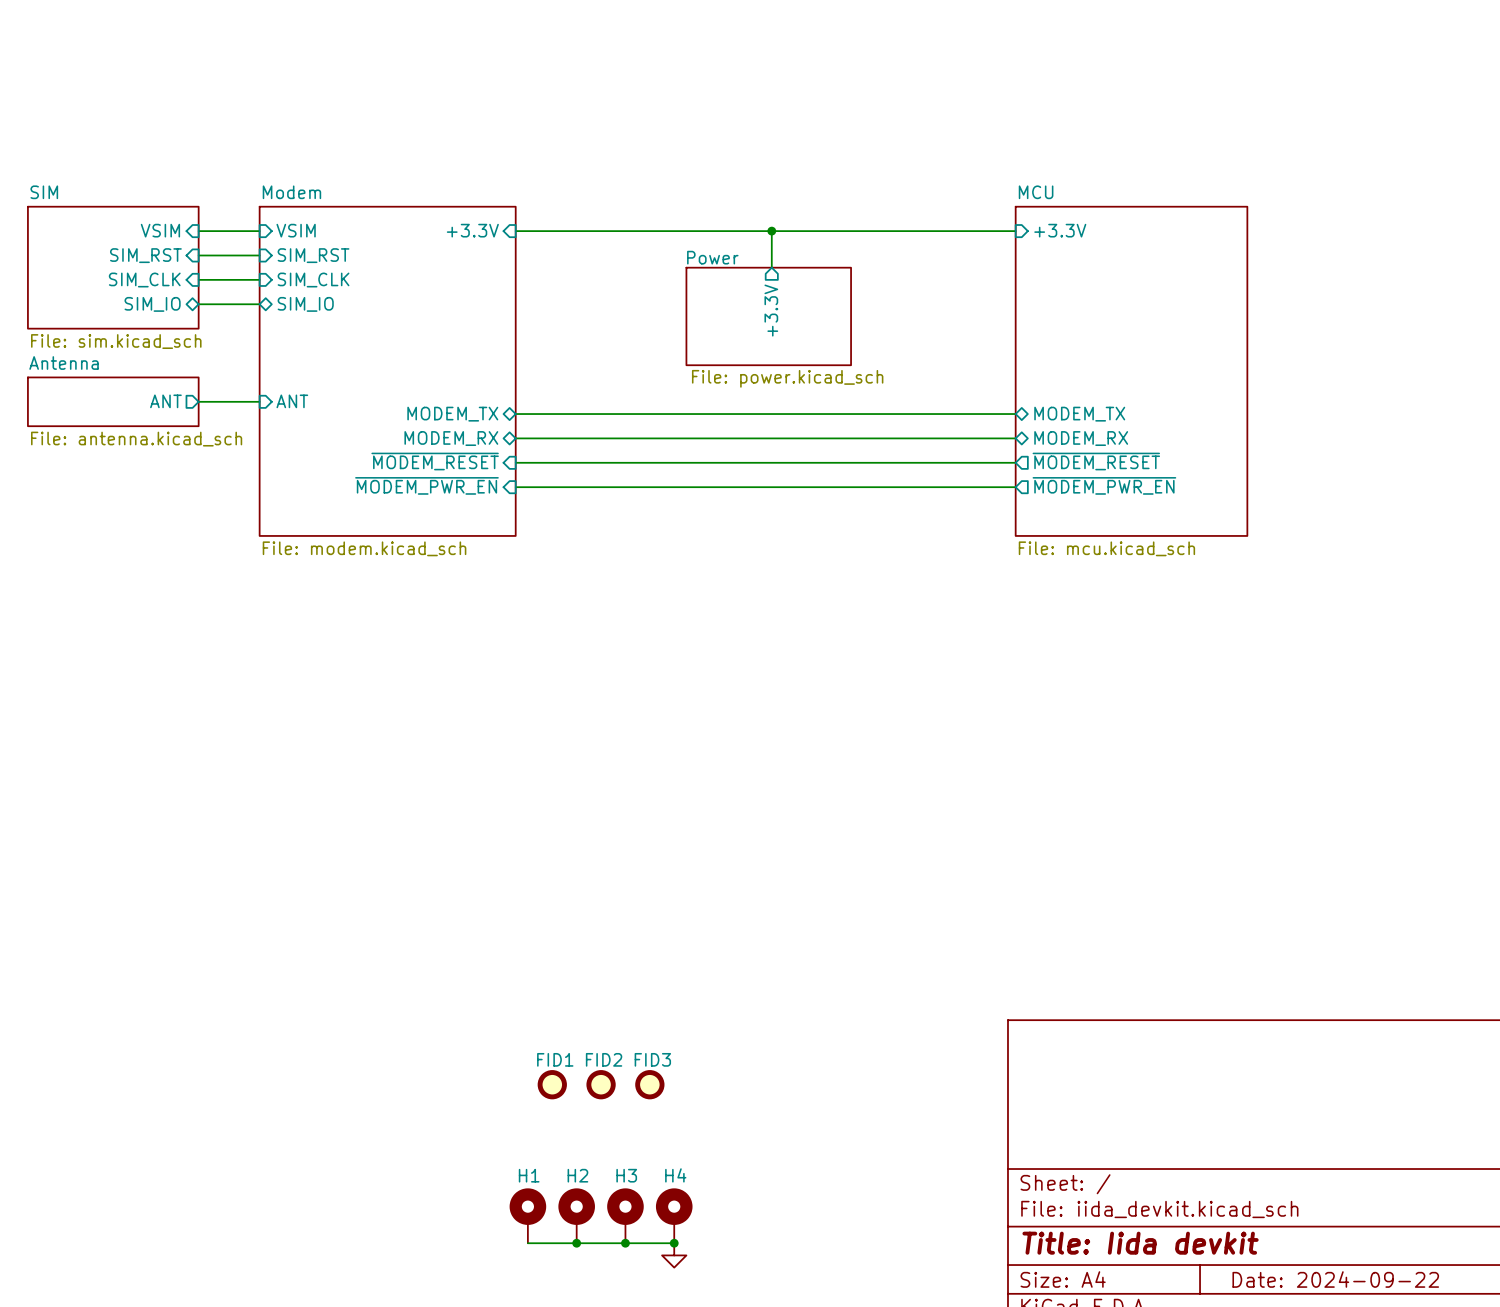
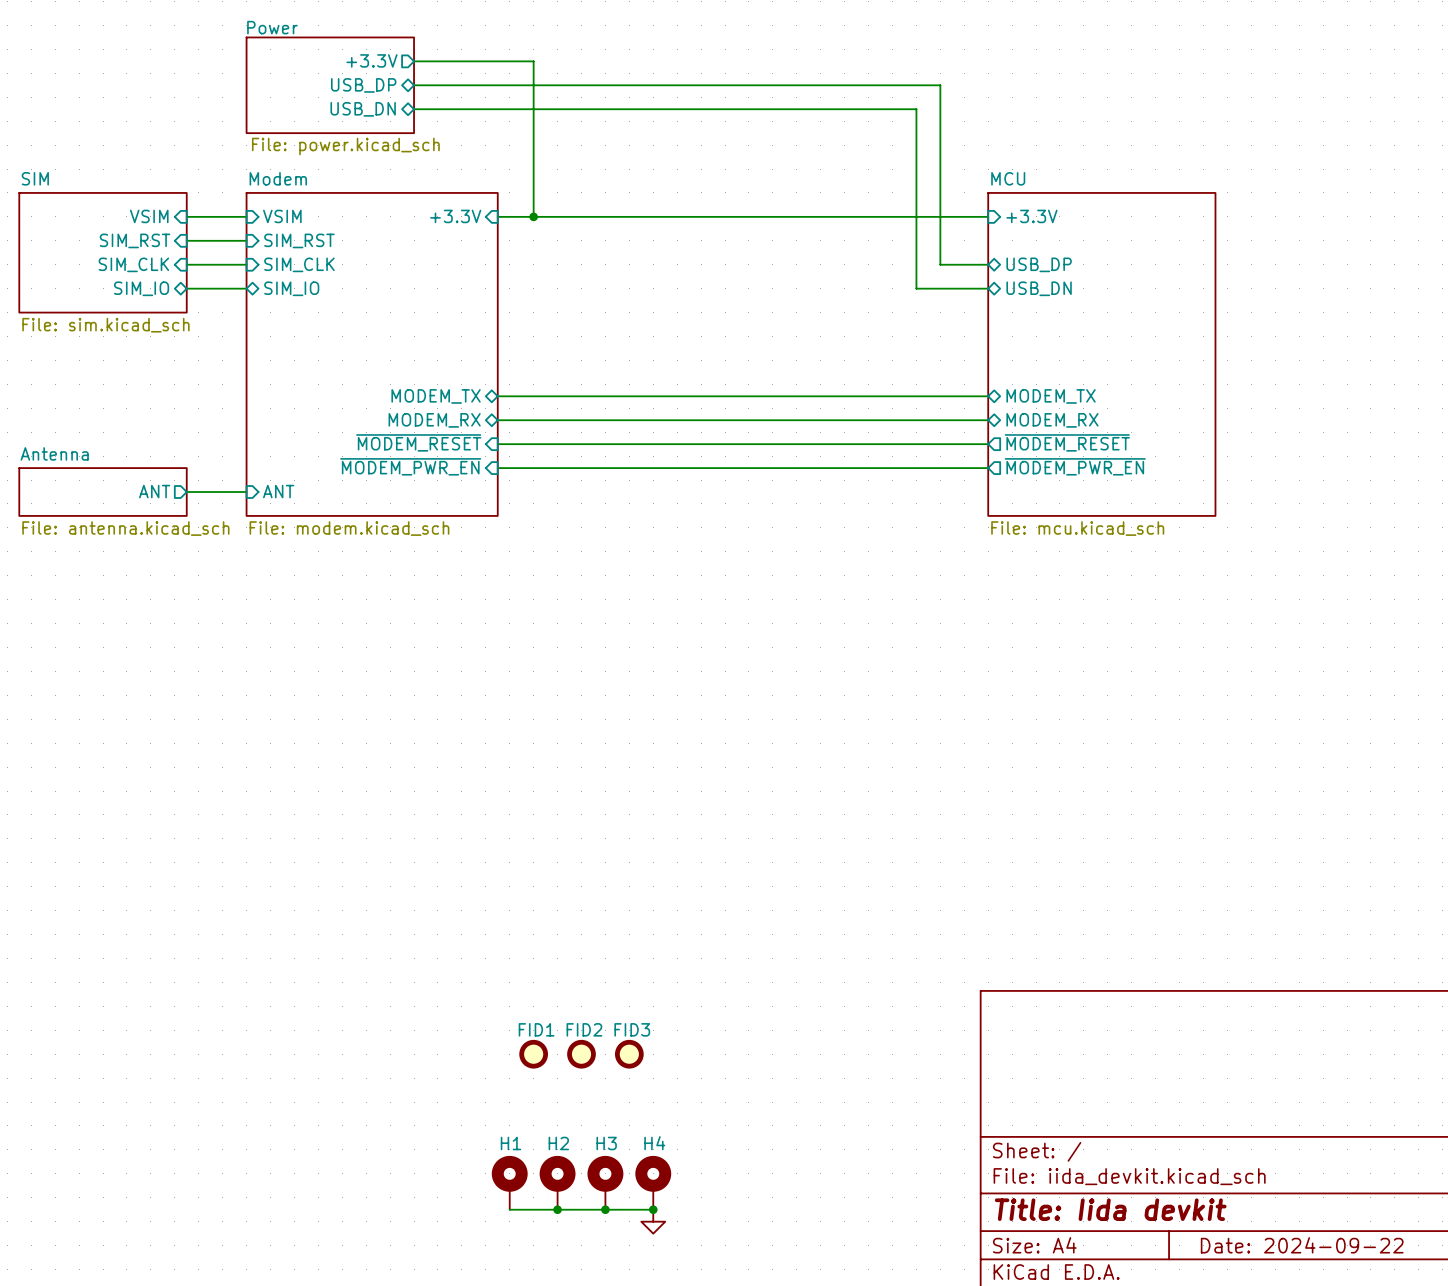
sheet pin: none -> +3.3V (371, 60)
wire: none -> (414, 61) (533, 61) (533, 216)
sheet Power: none -> File: power.kicad_sch (330, 85)
wire: none -> (414, 85) (940, 85) (940, 264) (988, 264)
sheet pin: none -> USB_DP (363, 85)
sheet pin: none -> USB_DN (363, 109)
wire: none -> (414, 109) (916, 109) (916, 288) (988, 288)
junction: none -> (533, 216)
wire: (771, 231) (771, 267) -> none
junction: (771, 231) -> none
sheet pin: none -> USB_DP (1039, 264)
sheet pin: none -> USB_DN (1039, 288)
sheet pin: +3.3V (771, 310) -> none
sheet Power: File: power.kicad_sch (768, 316) -> none
sheet Antenna position: (113, 401) -> (103, 492)
sheet pin: ANT (165, 401) -> none
wire: (198, 401) (259, 401) -> (186, 492) (246, 492)
sheet pin: ANT (292, 401) -> none
sheet pin: none -> ANT (154, 491)
sheet pin: none -> ANT (278, 491)

